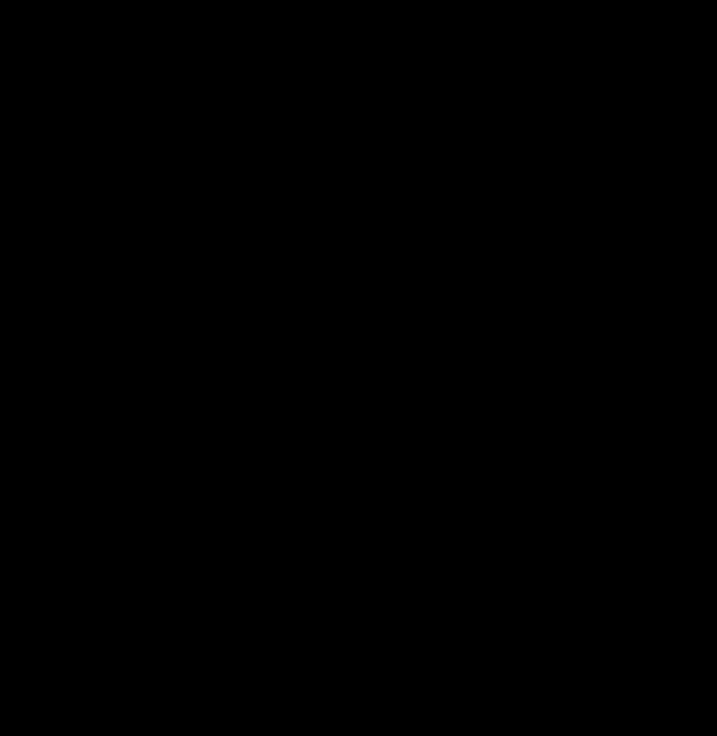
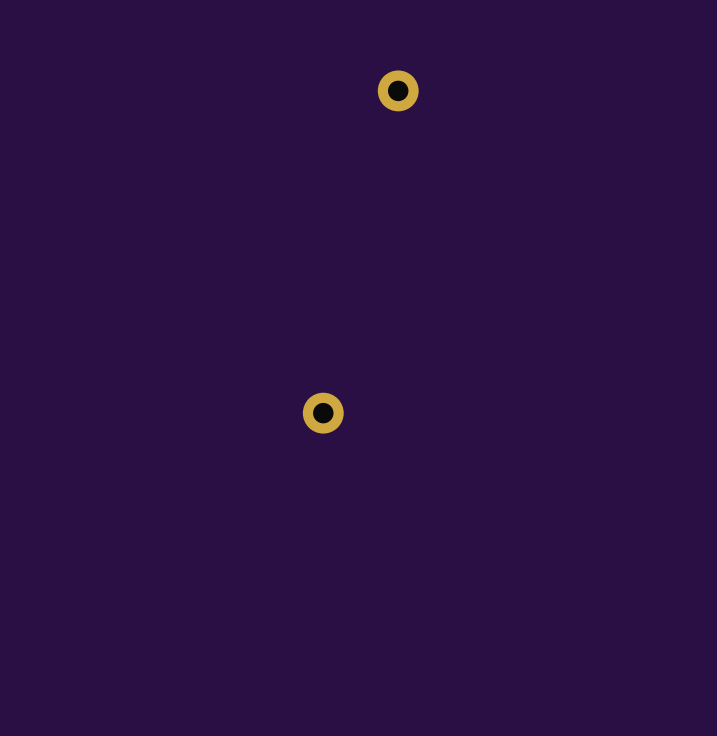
via: none -> (398, 90)
via: none -> (323, 413)

